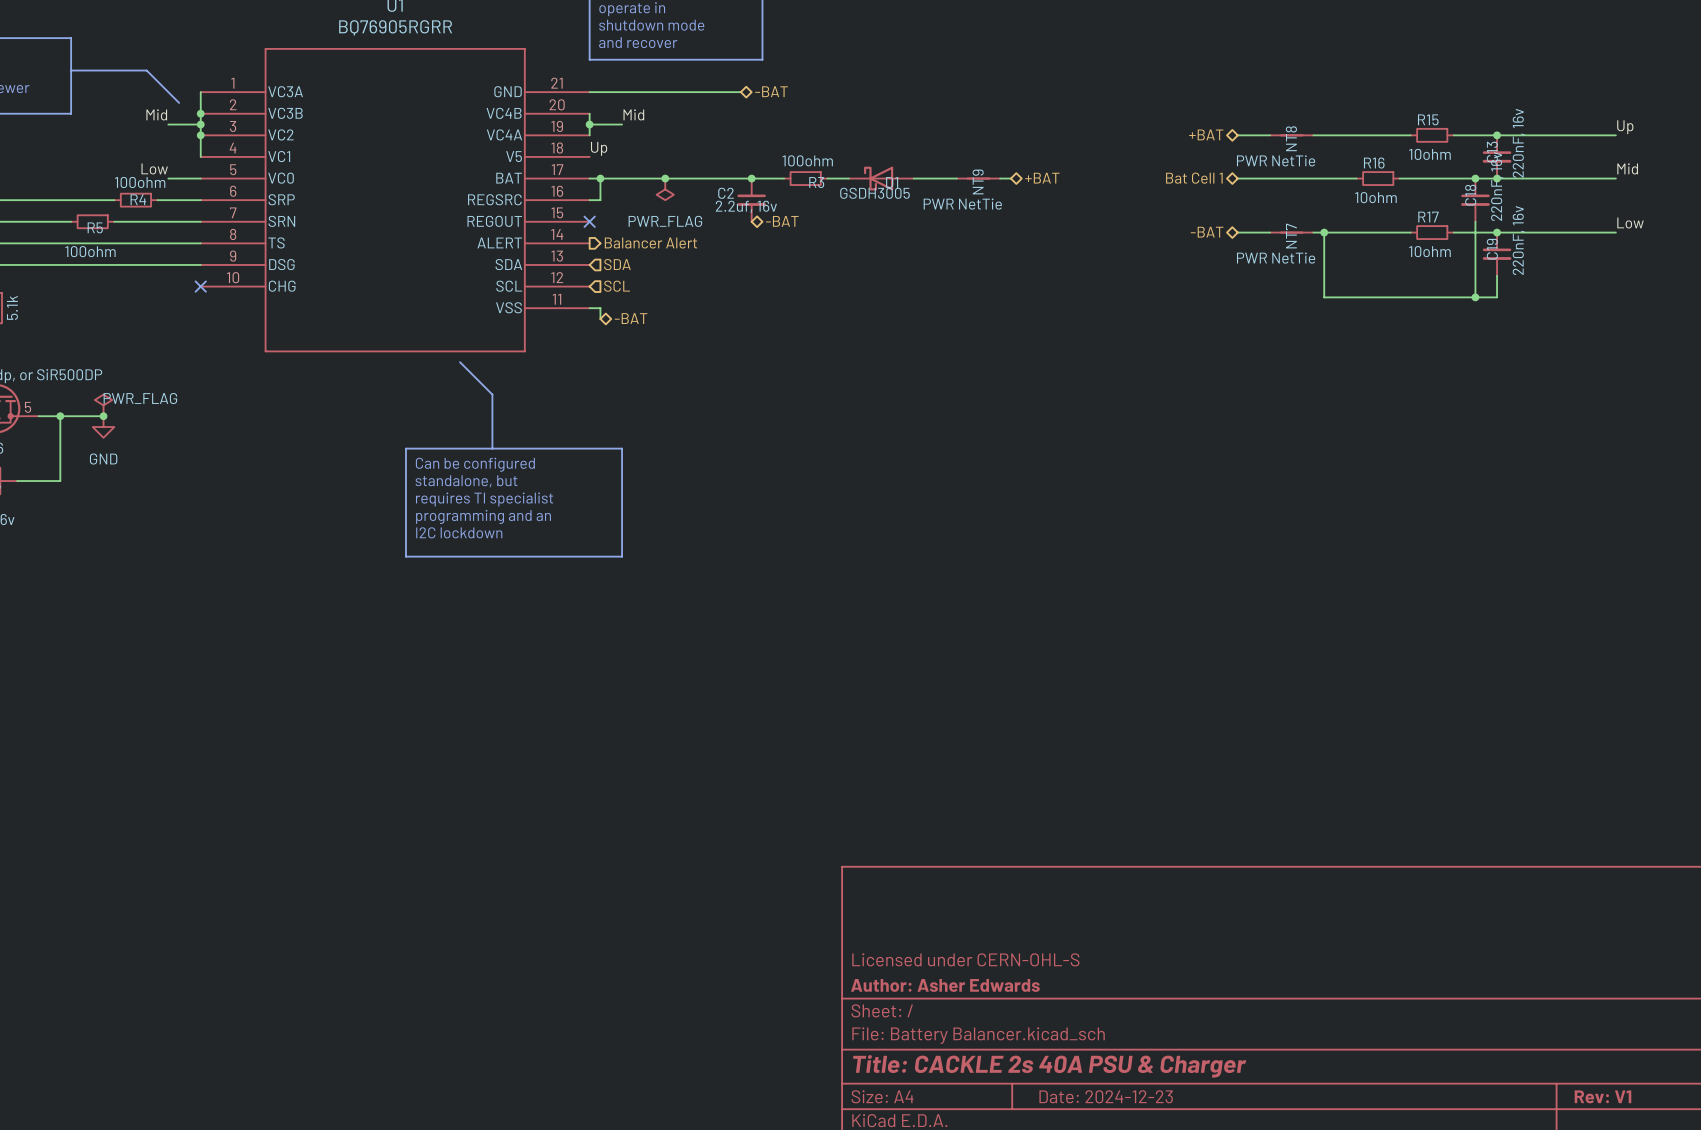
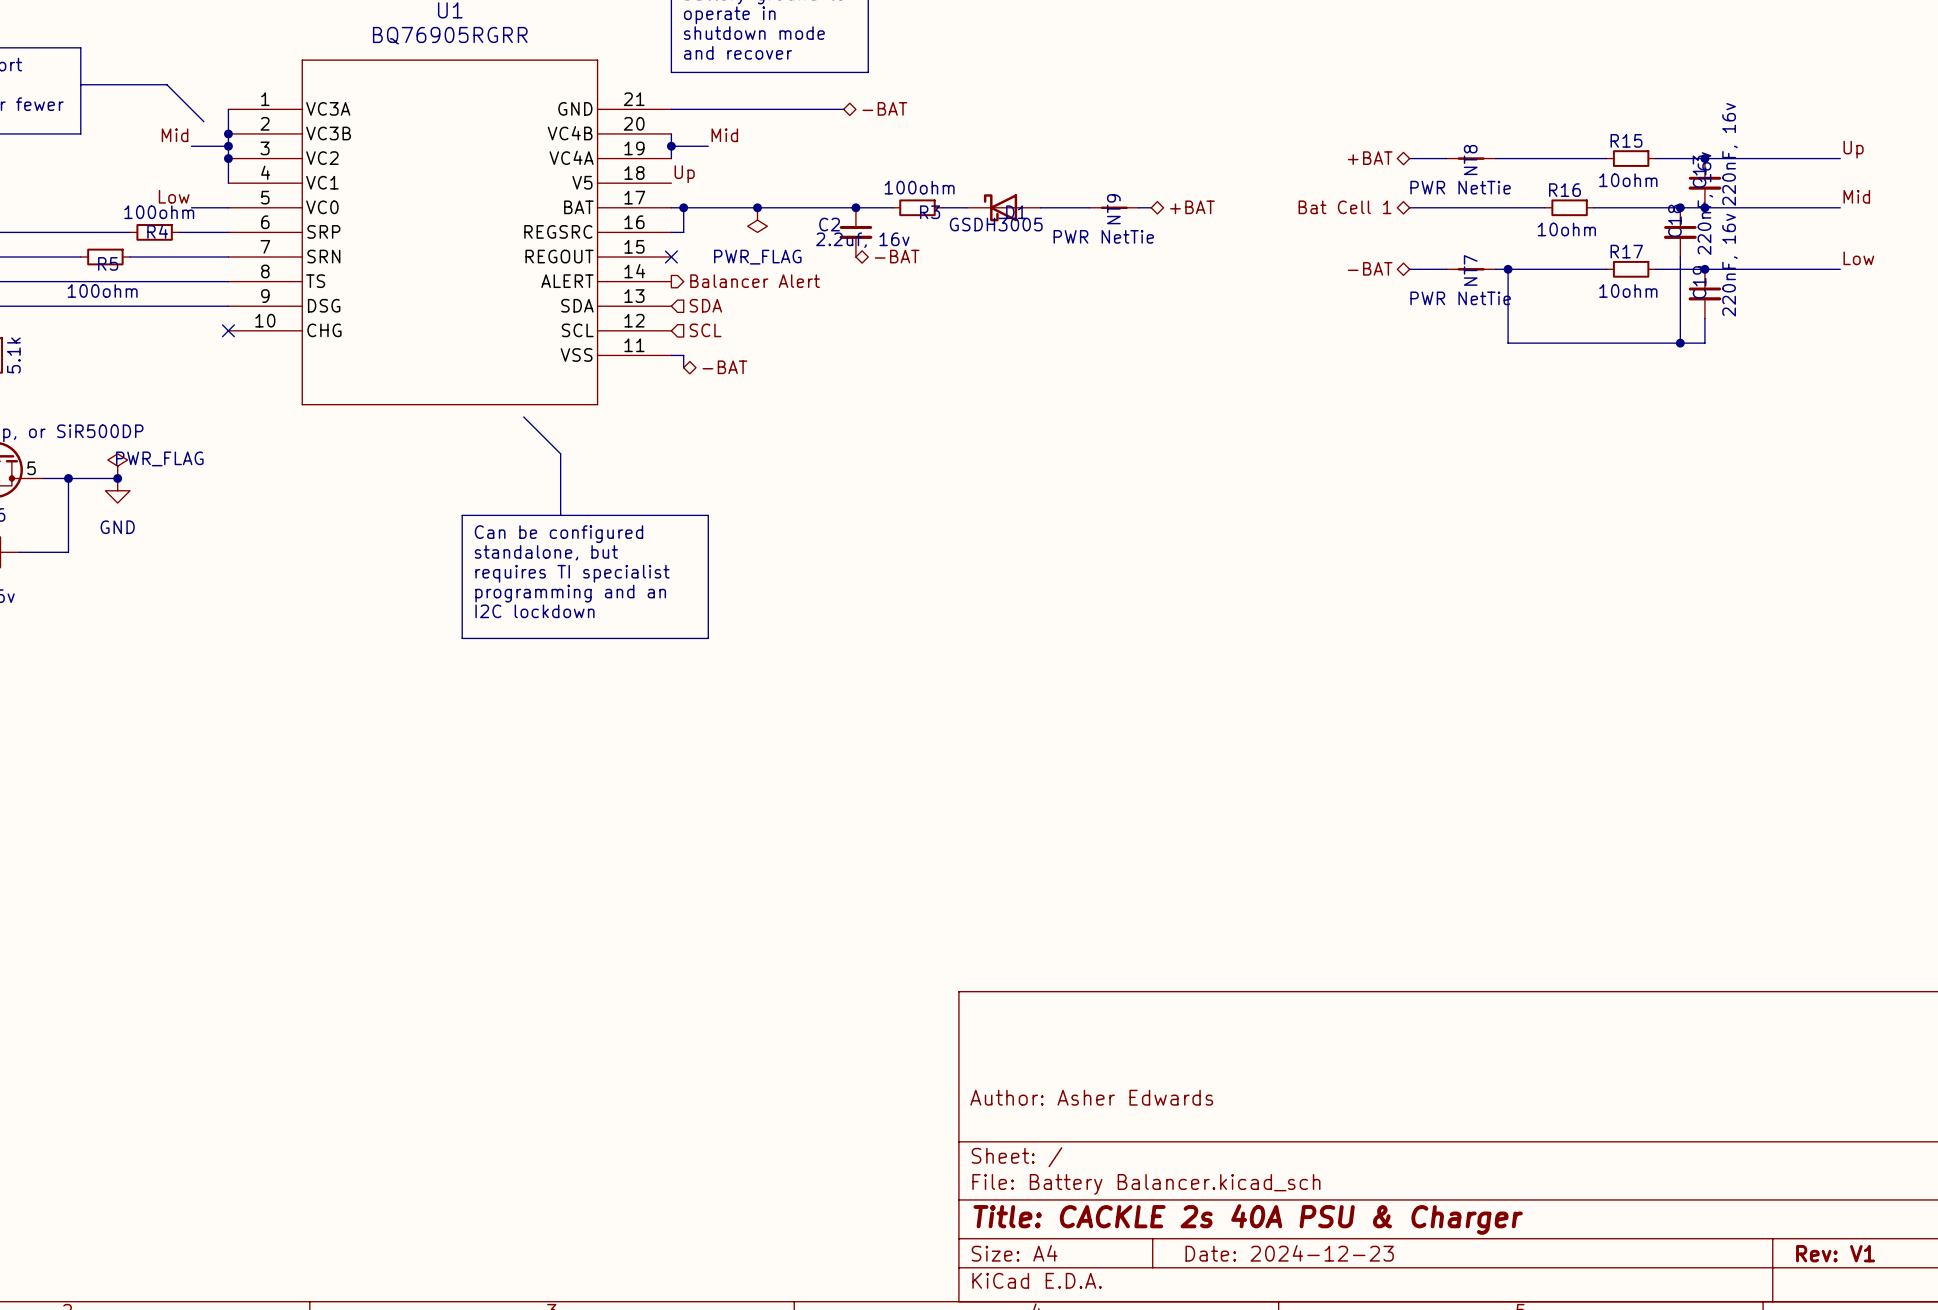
title block: Licensed under CERN-OHL-S (965, 959) -> Author: Asher Edwards (1091, 1097)
title block: Author: Asher Edwards (945, 985) -> none

